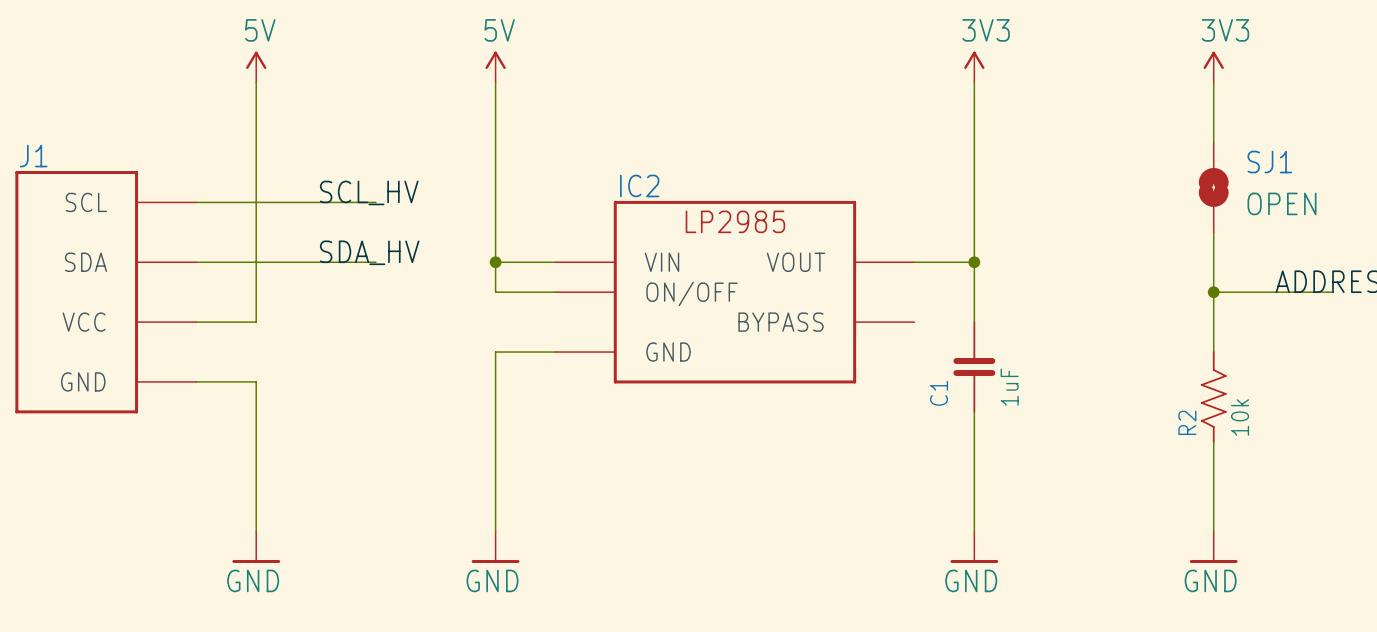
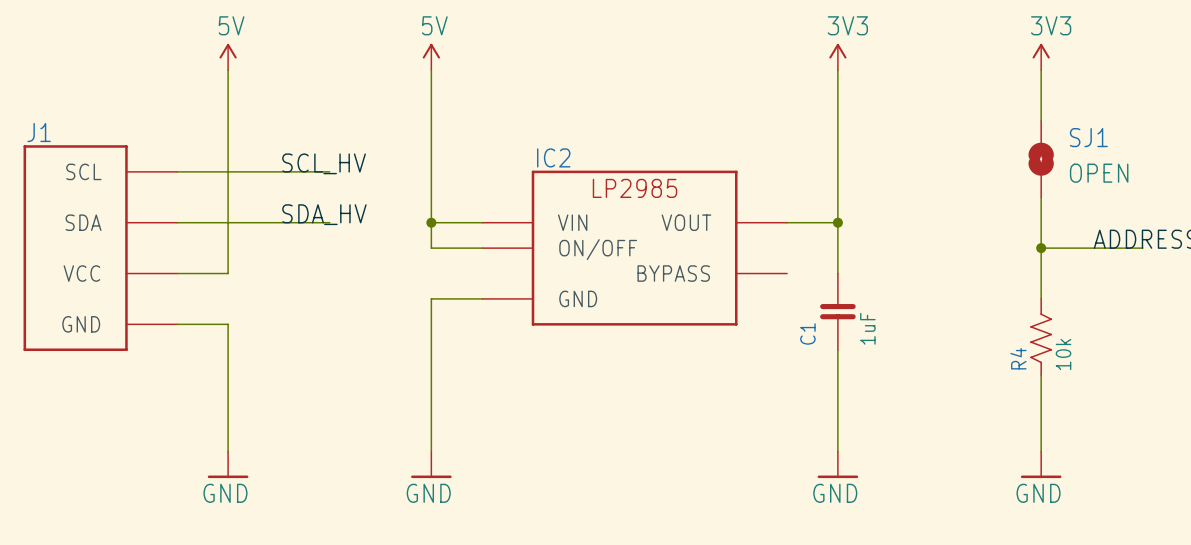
R2 name: R2 (1187, 422) -> R4 (1018, 358)

